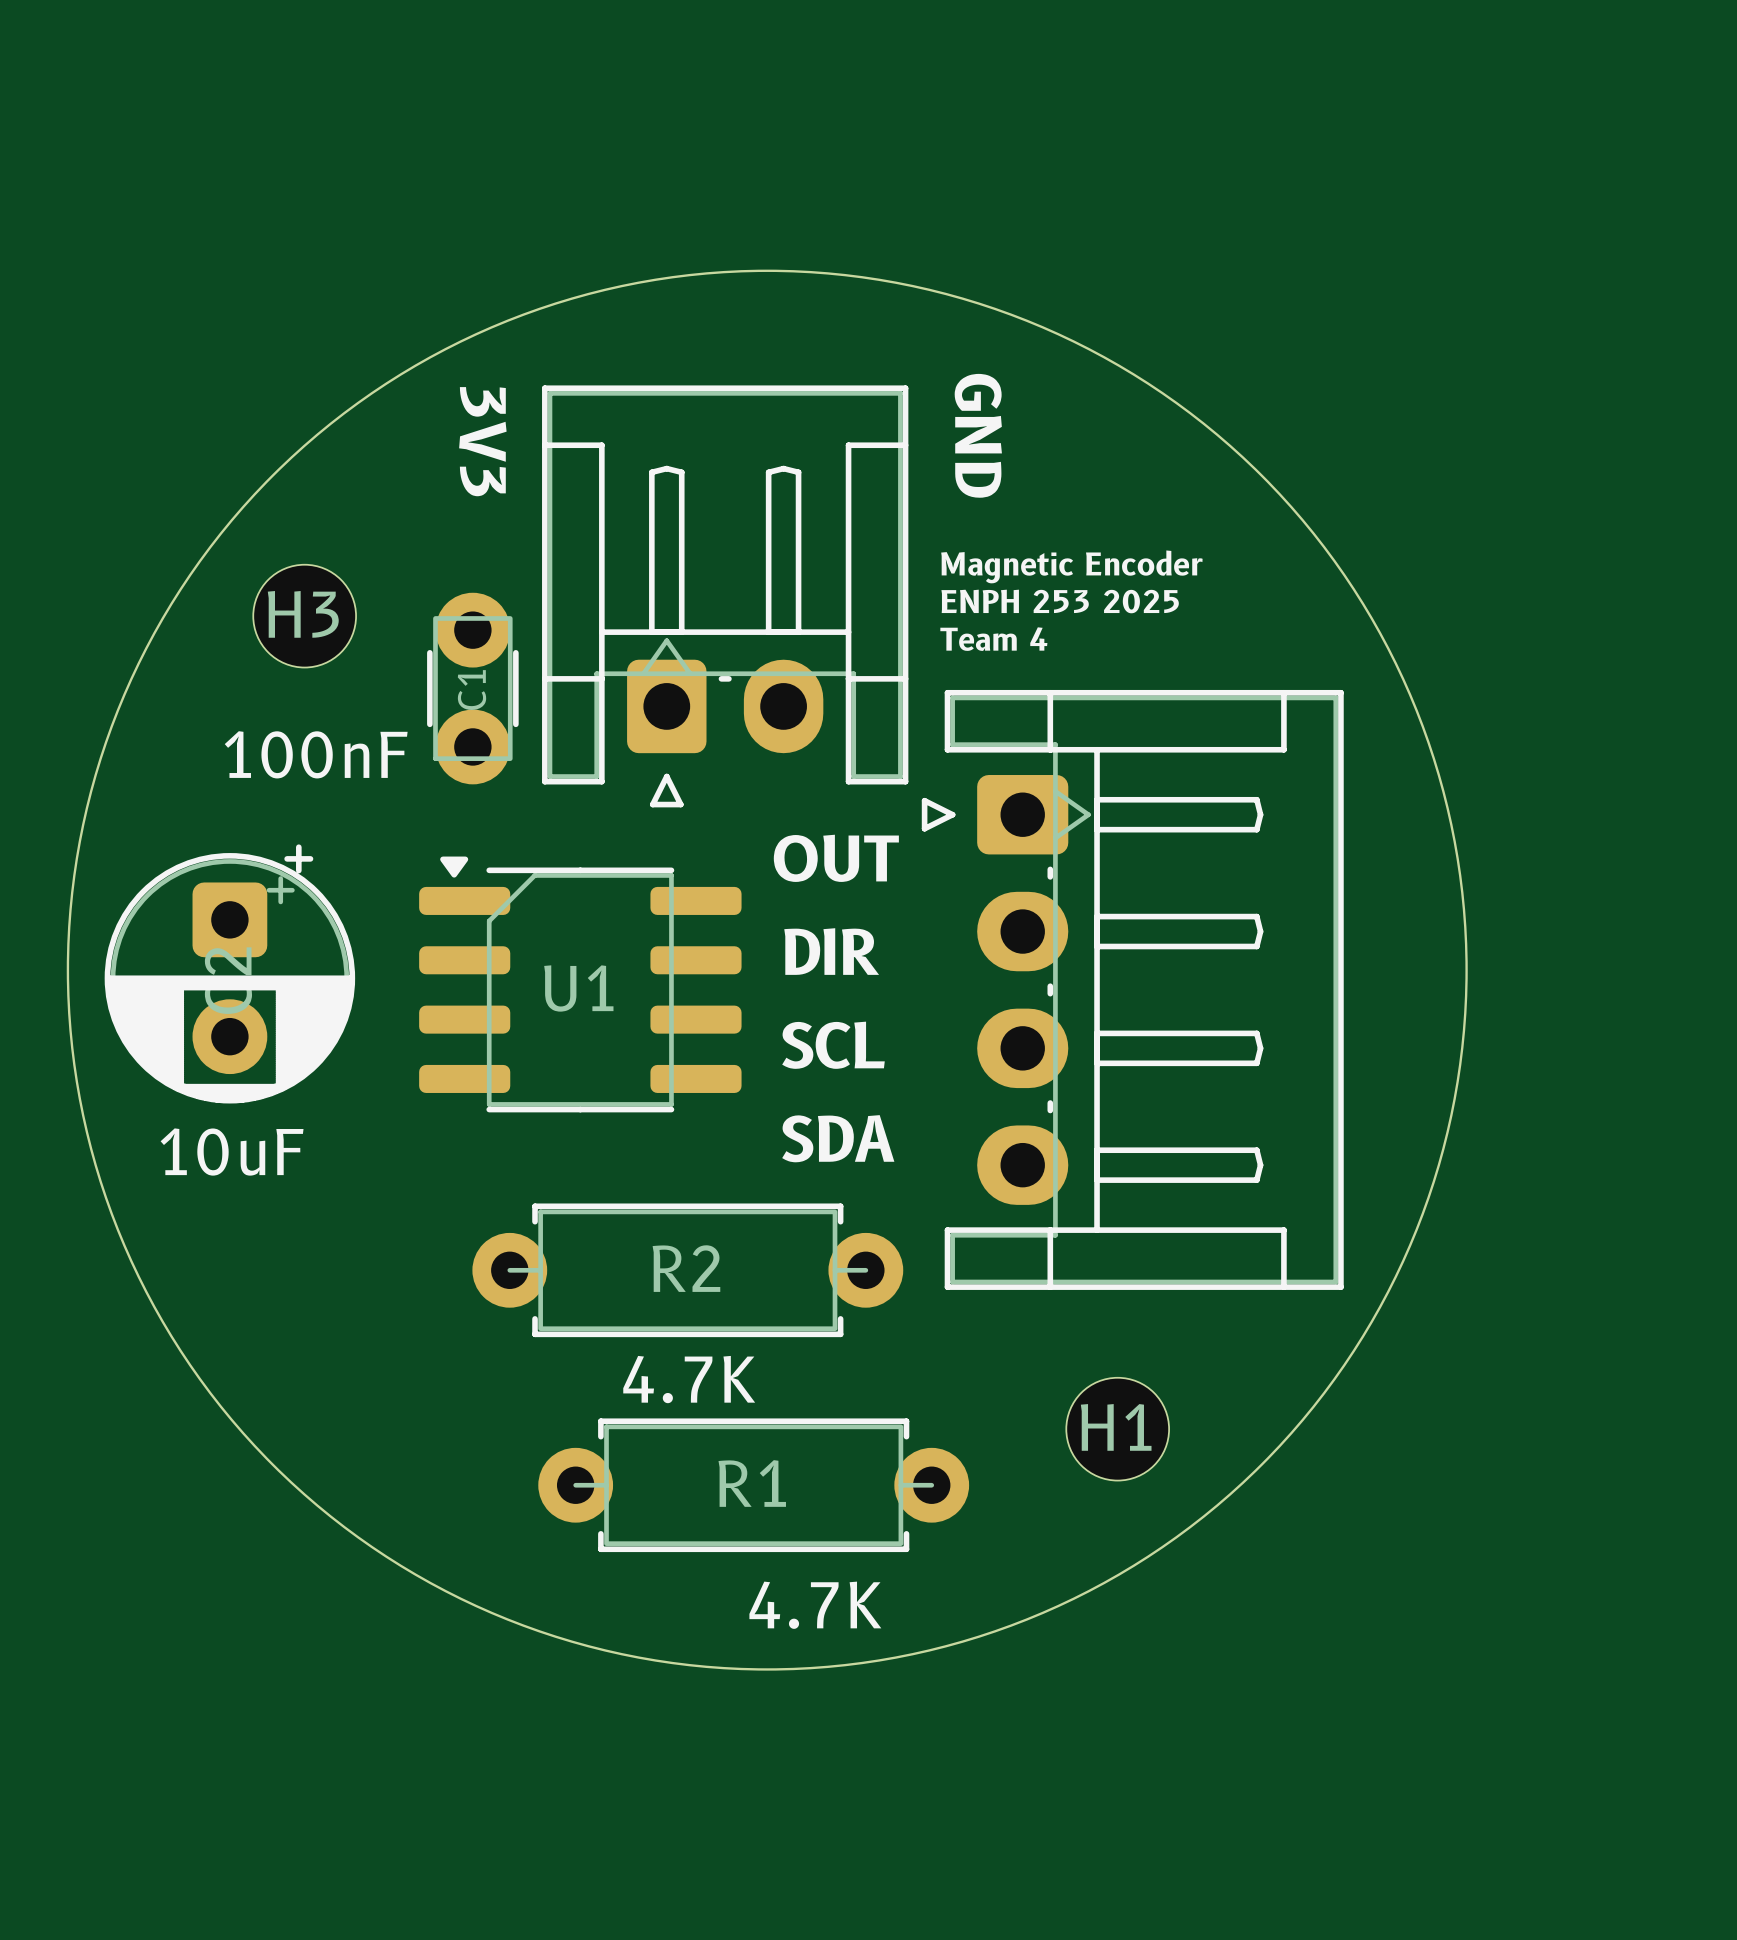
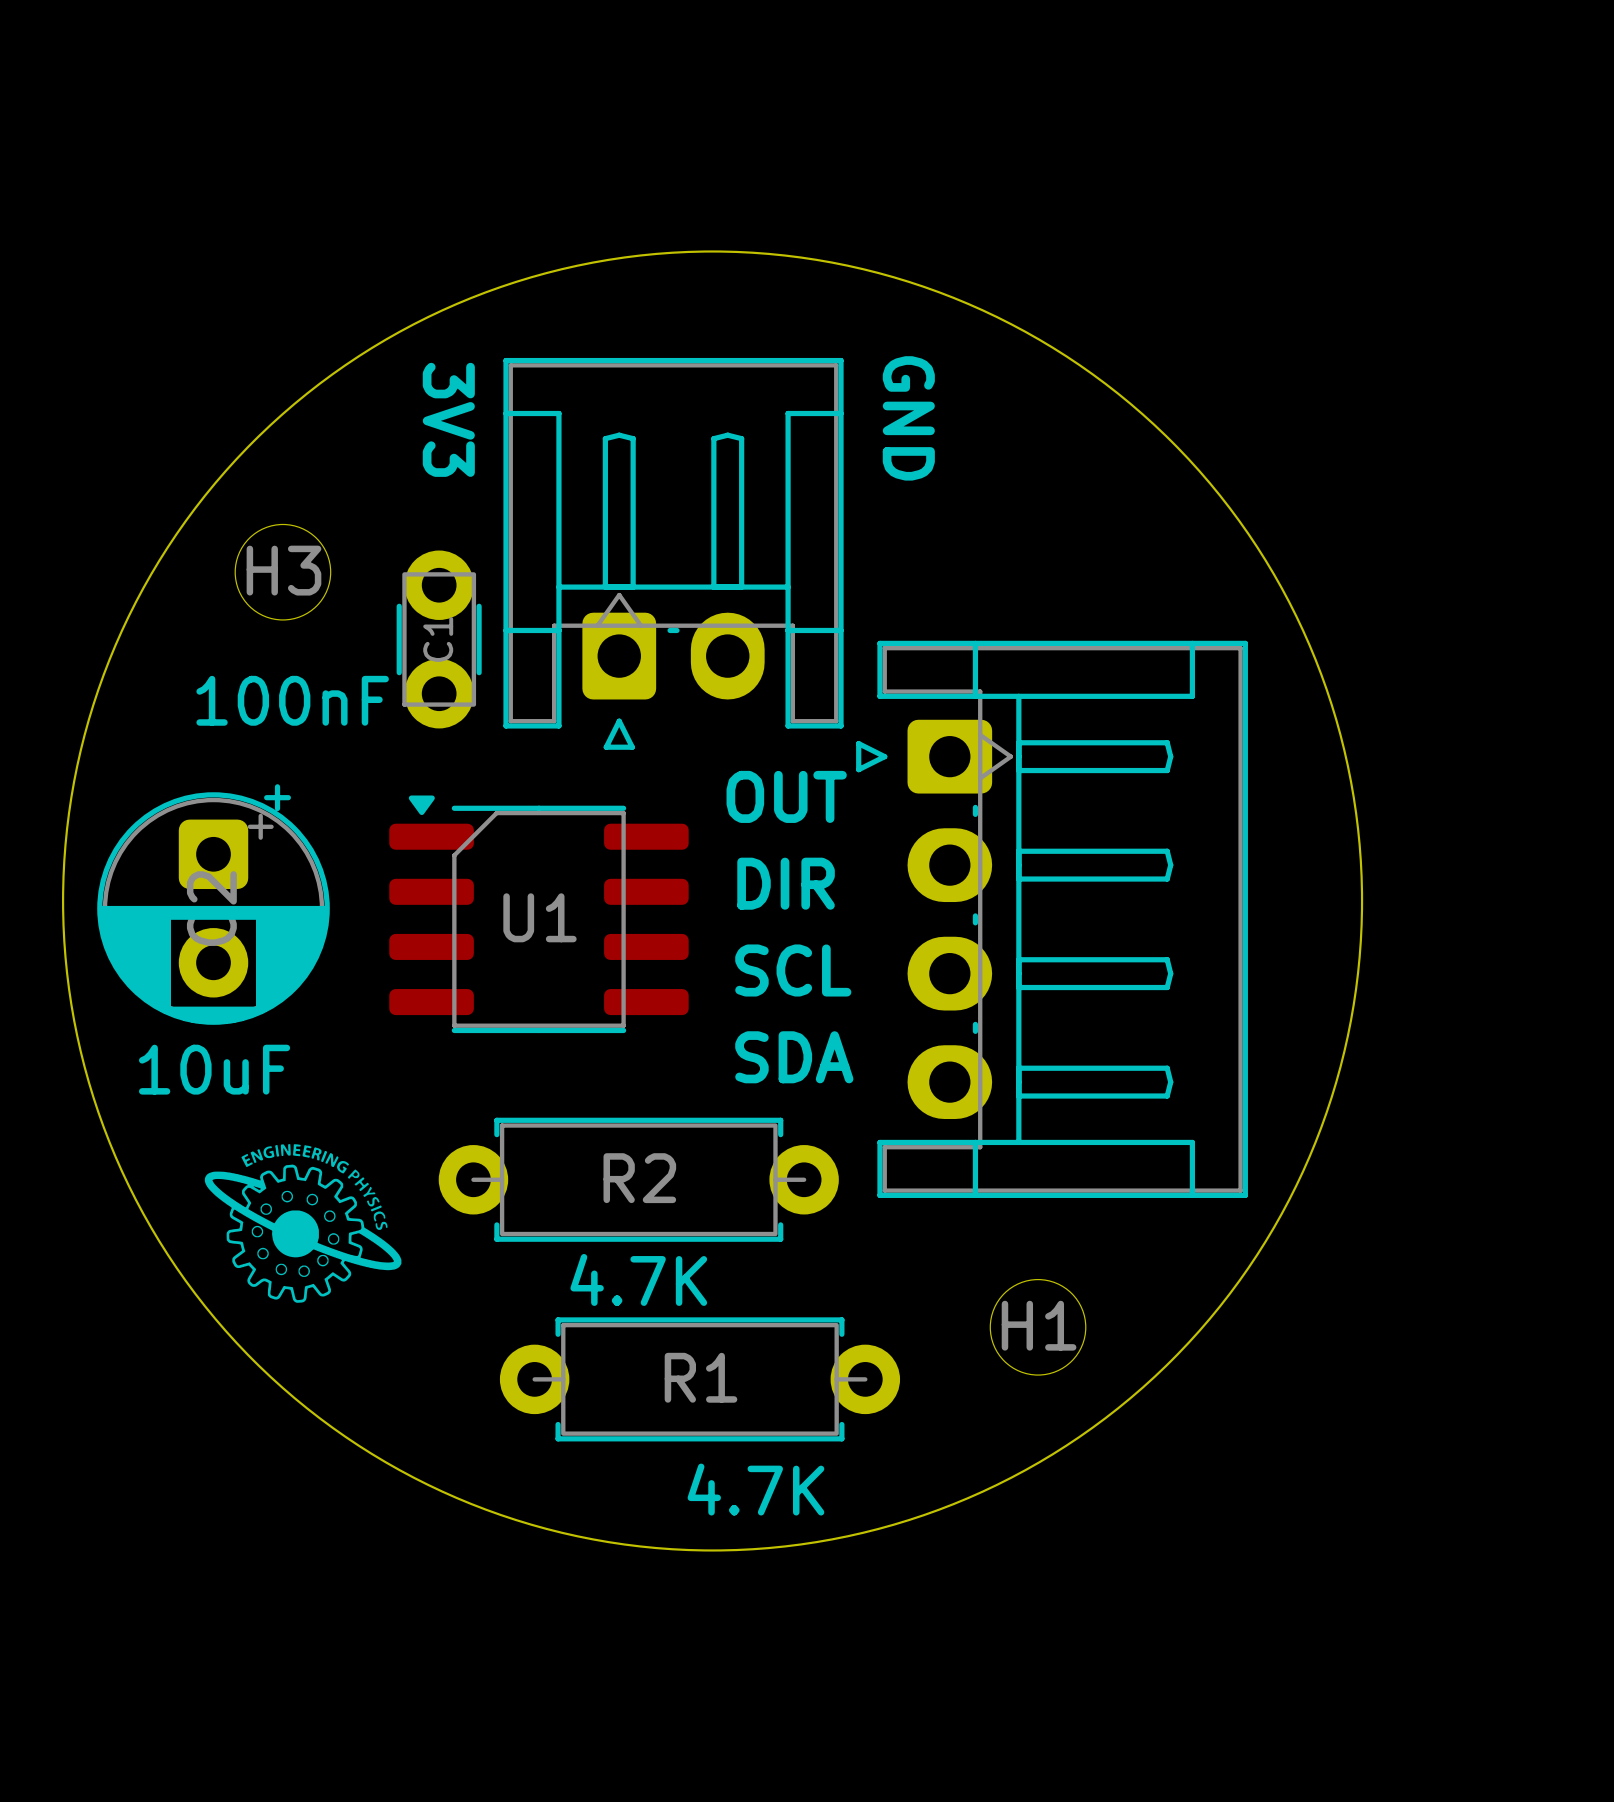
text: Magnetic Encoder (1071, 566) -> none
text: ENPH 253 2025 (1060, 601) -> none
text: Team 4 (993, 639) -> none
drawing: none -> [204, 1144, 402, 1303]

